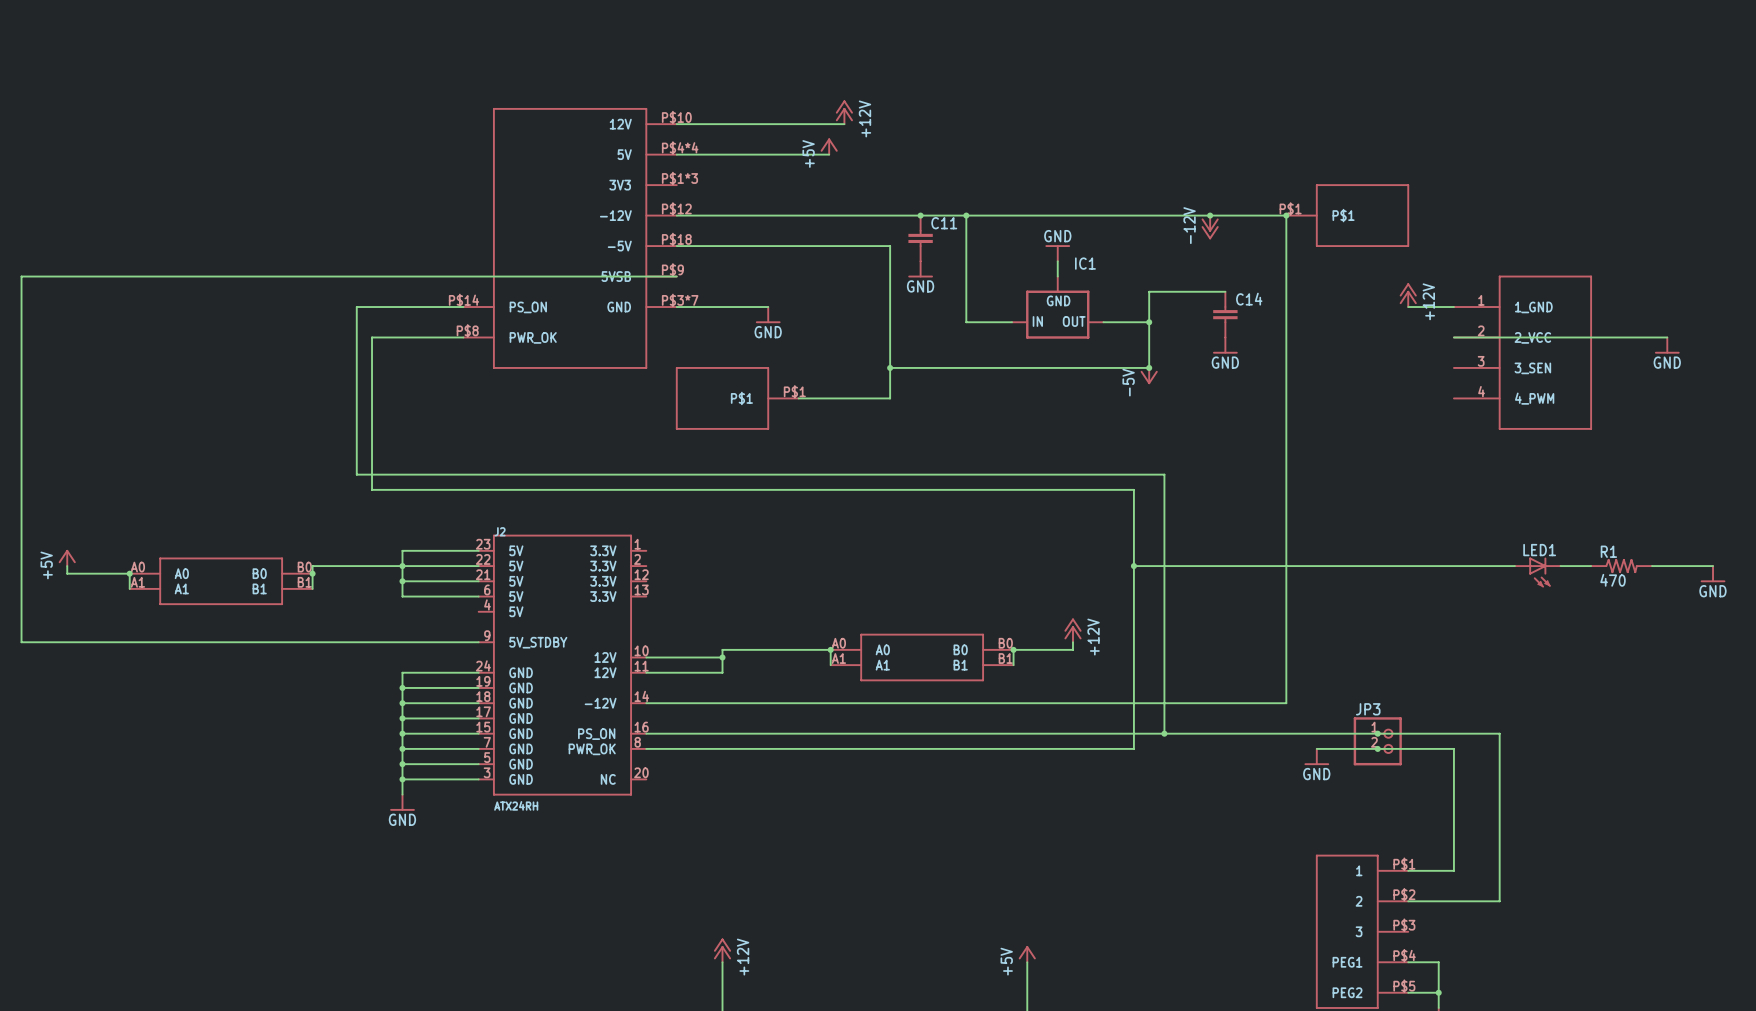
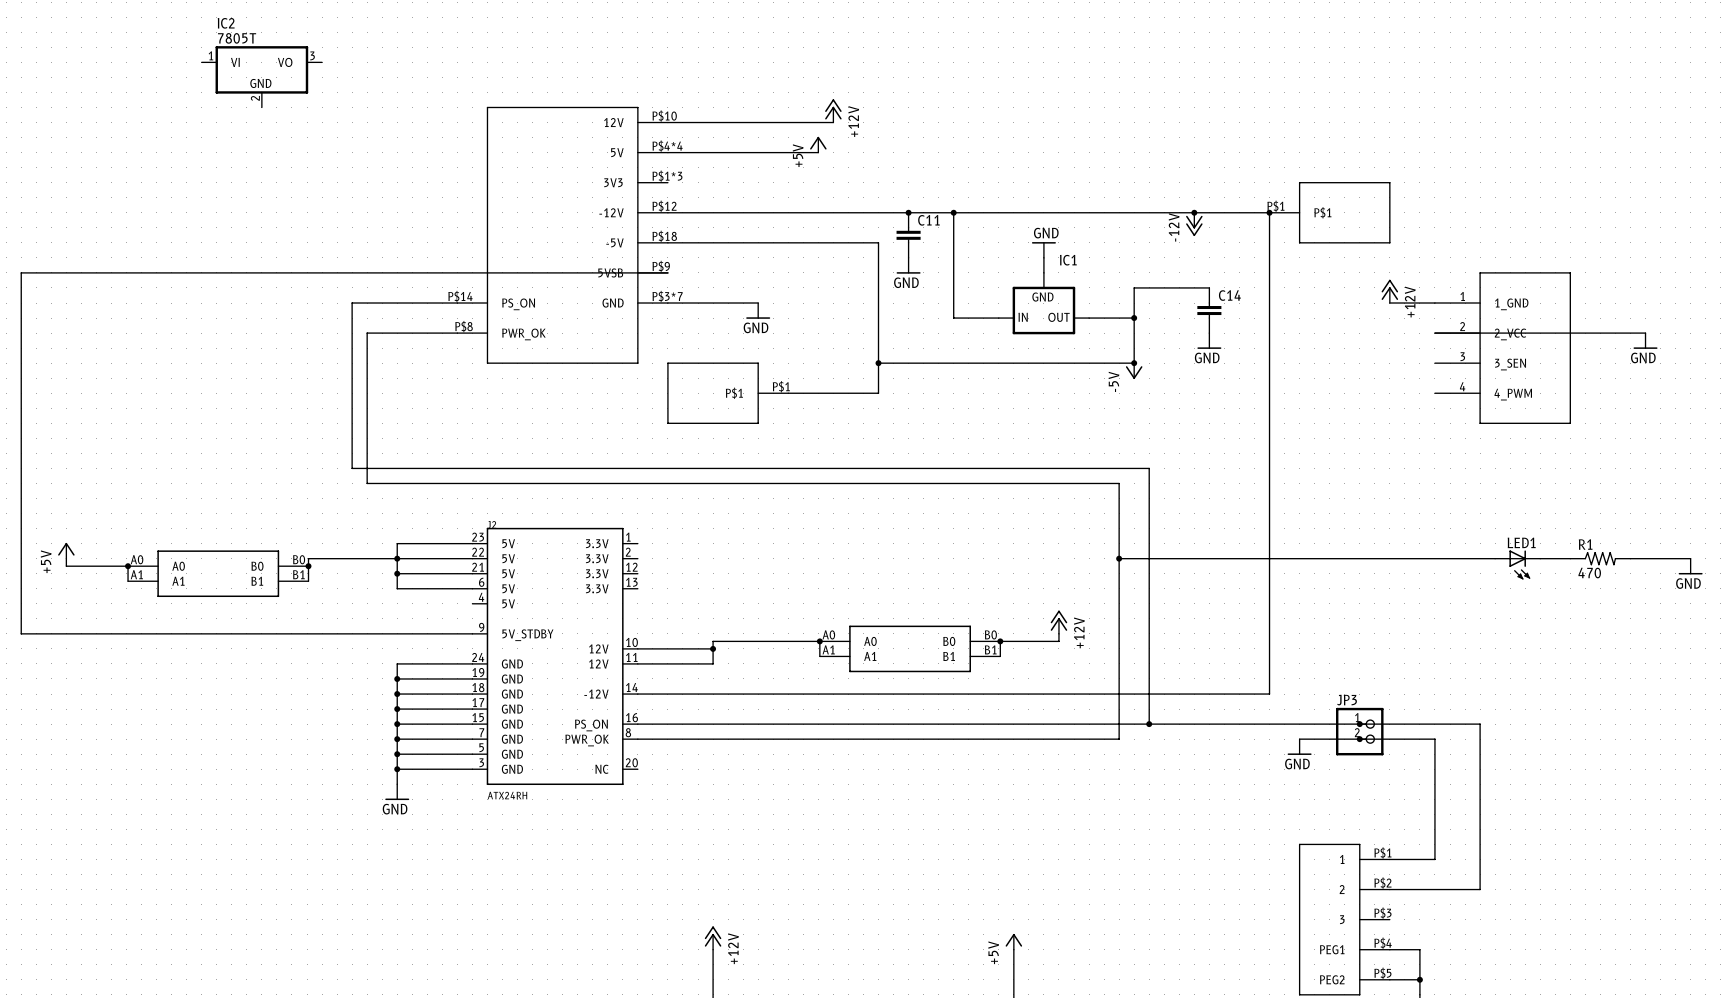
IC2: none -> 7805T (261, 76)

